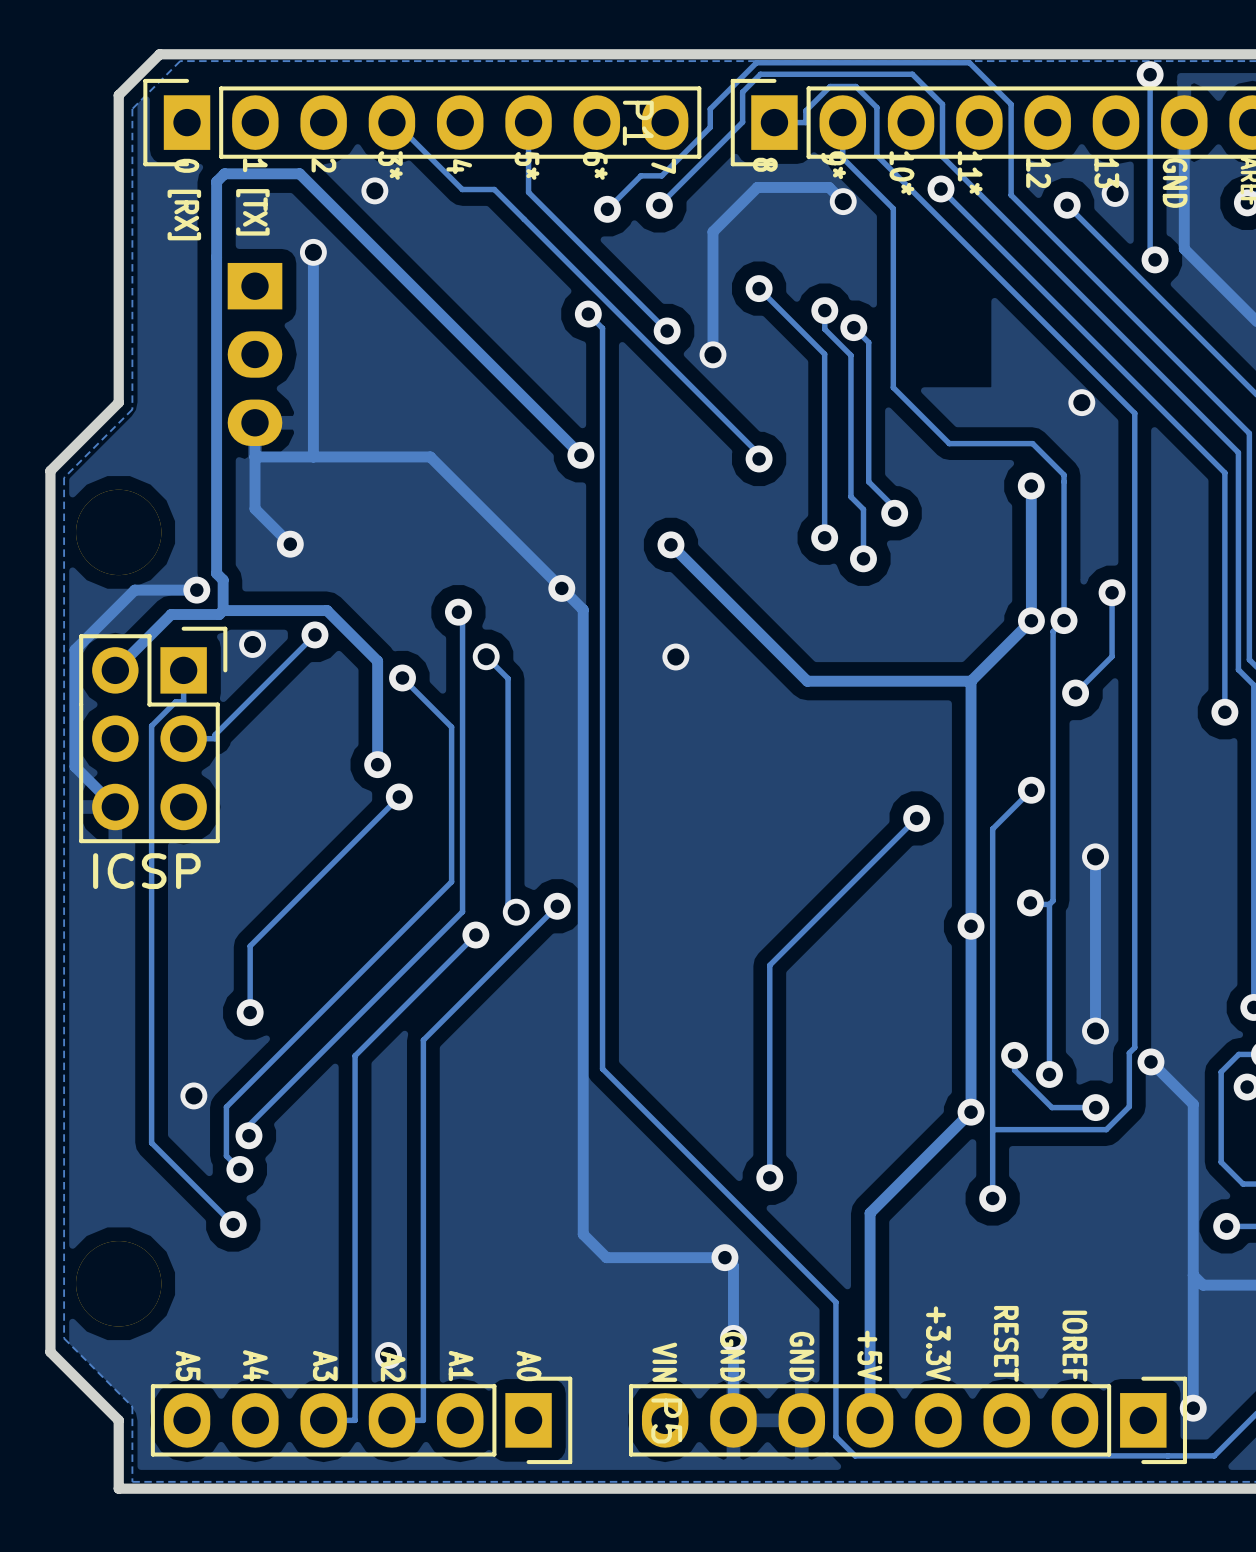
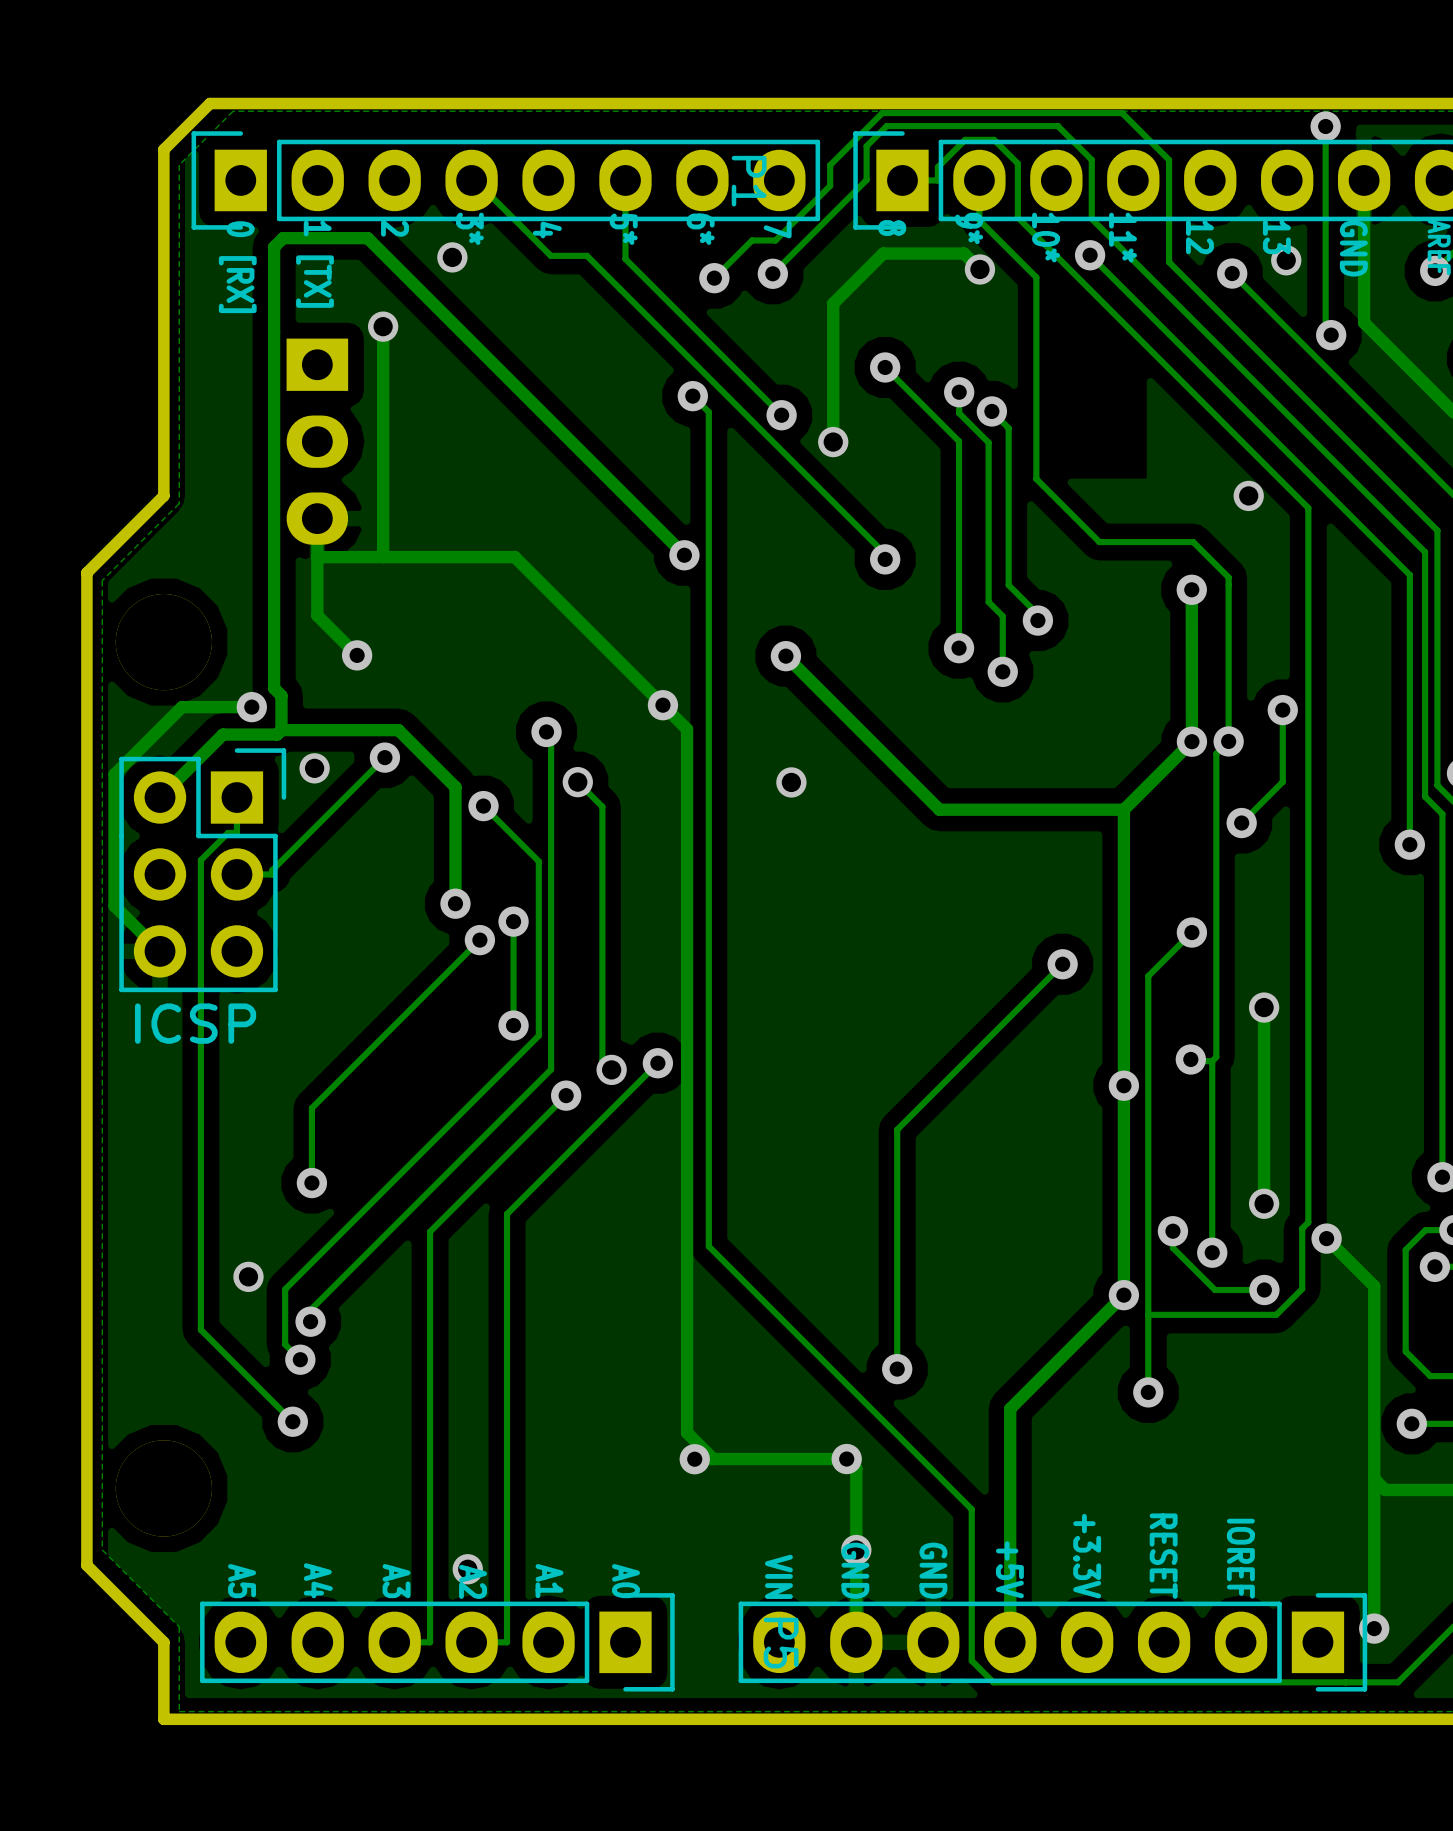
track: none -> (513, 921) (513, 1025)
via: none -> (513, 921)
via: none -> (513, 1025)
via: none -> (694, 1459)

